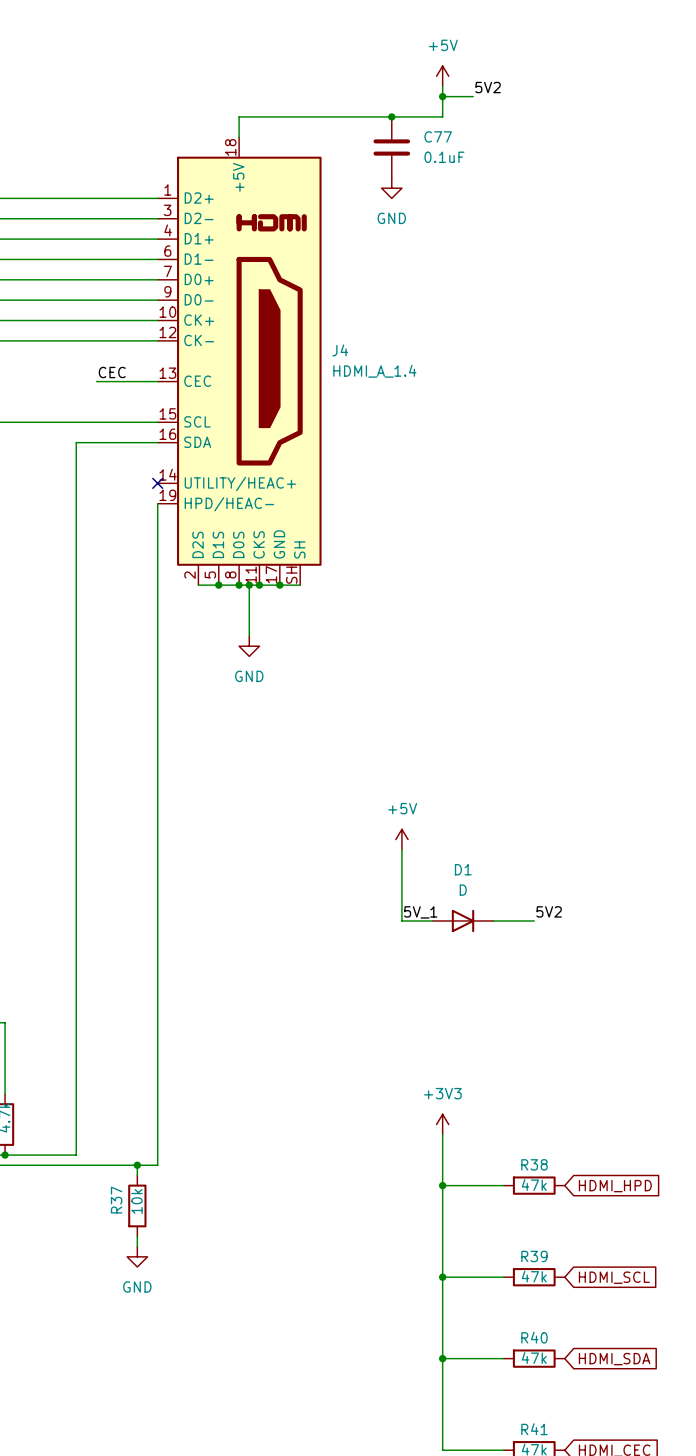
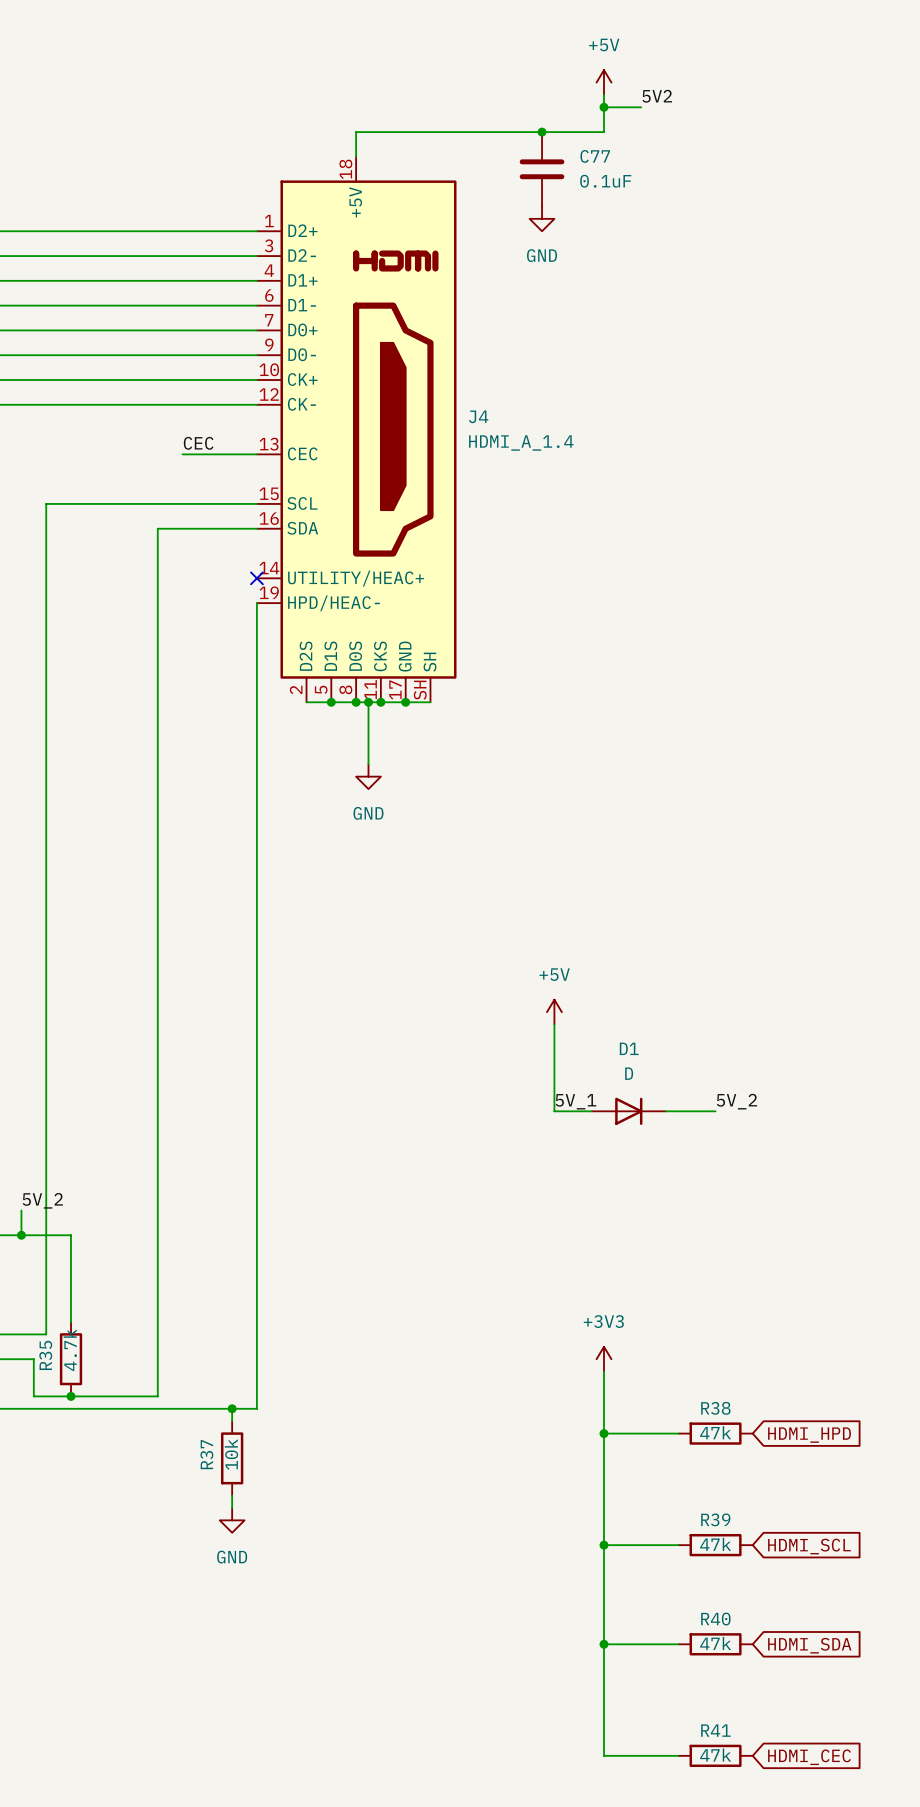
label: 5V2 (549, 911) -> 5V_2 (736, 1101)

